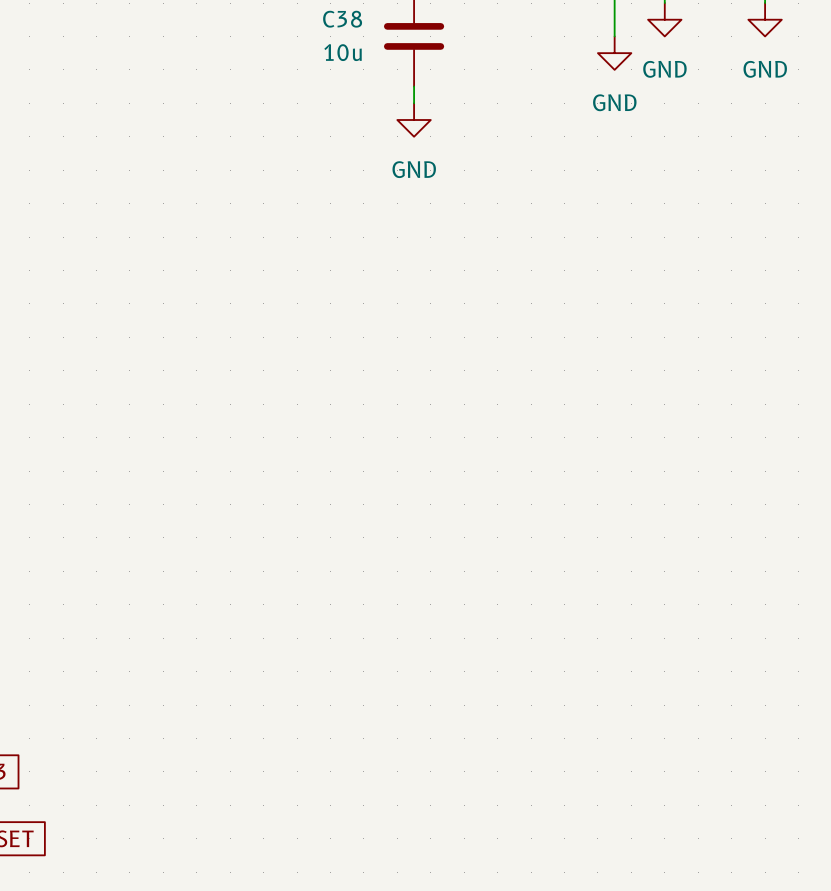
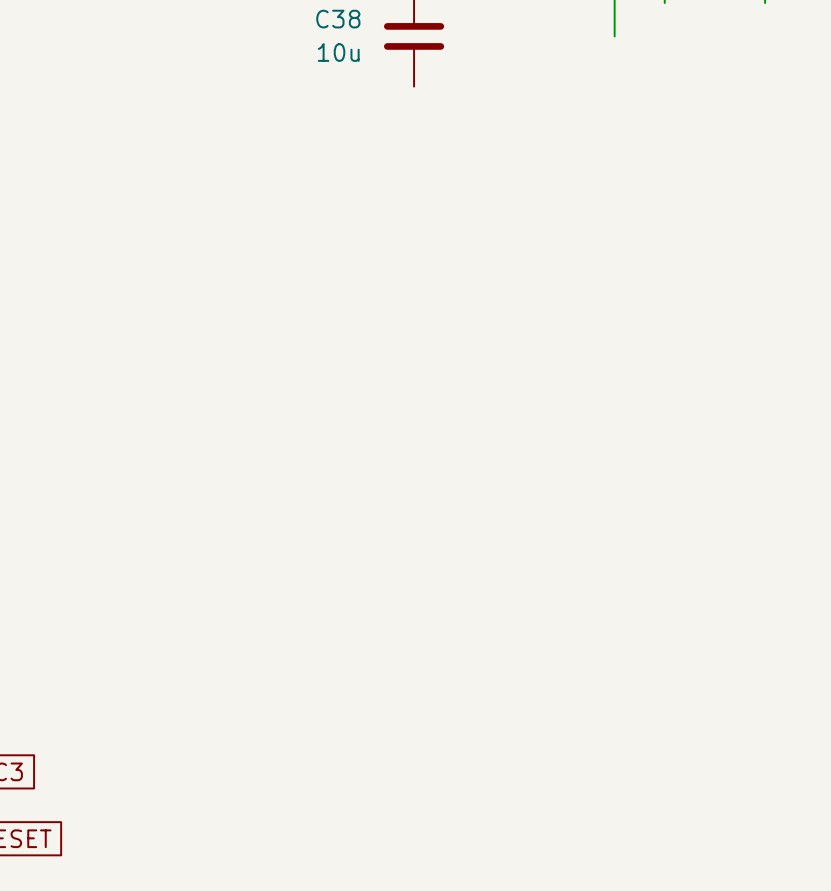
power symbol: GND (664, 19) -> none
power symbol: GND (765, 19) -> none
power symbol: GND (614, 53) -> none
wire: (414, 86) (414, 103) -> none
power symbol: GND (414, 120) -> none

